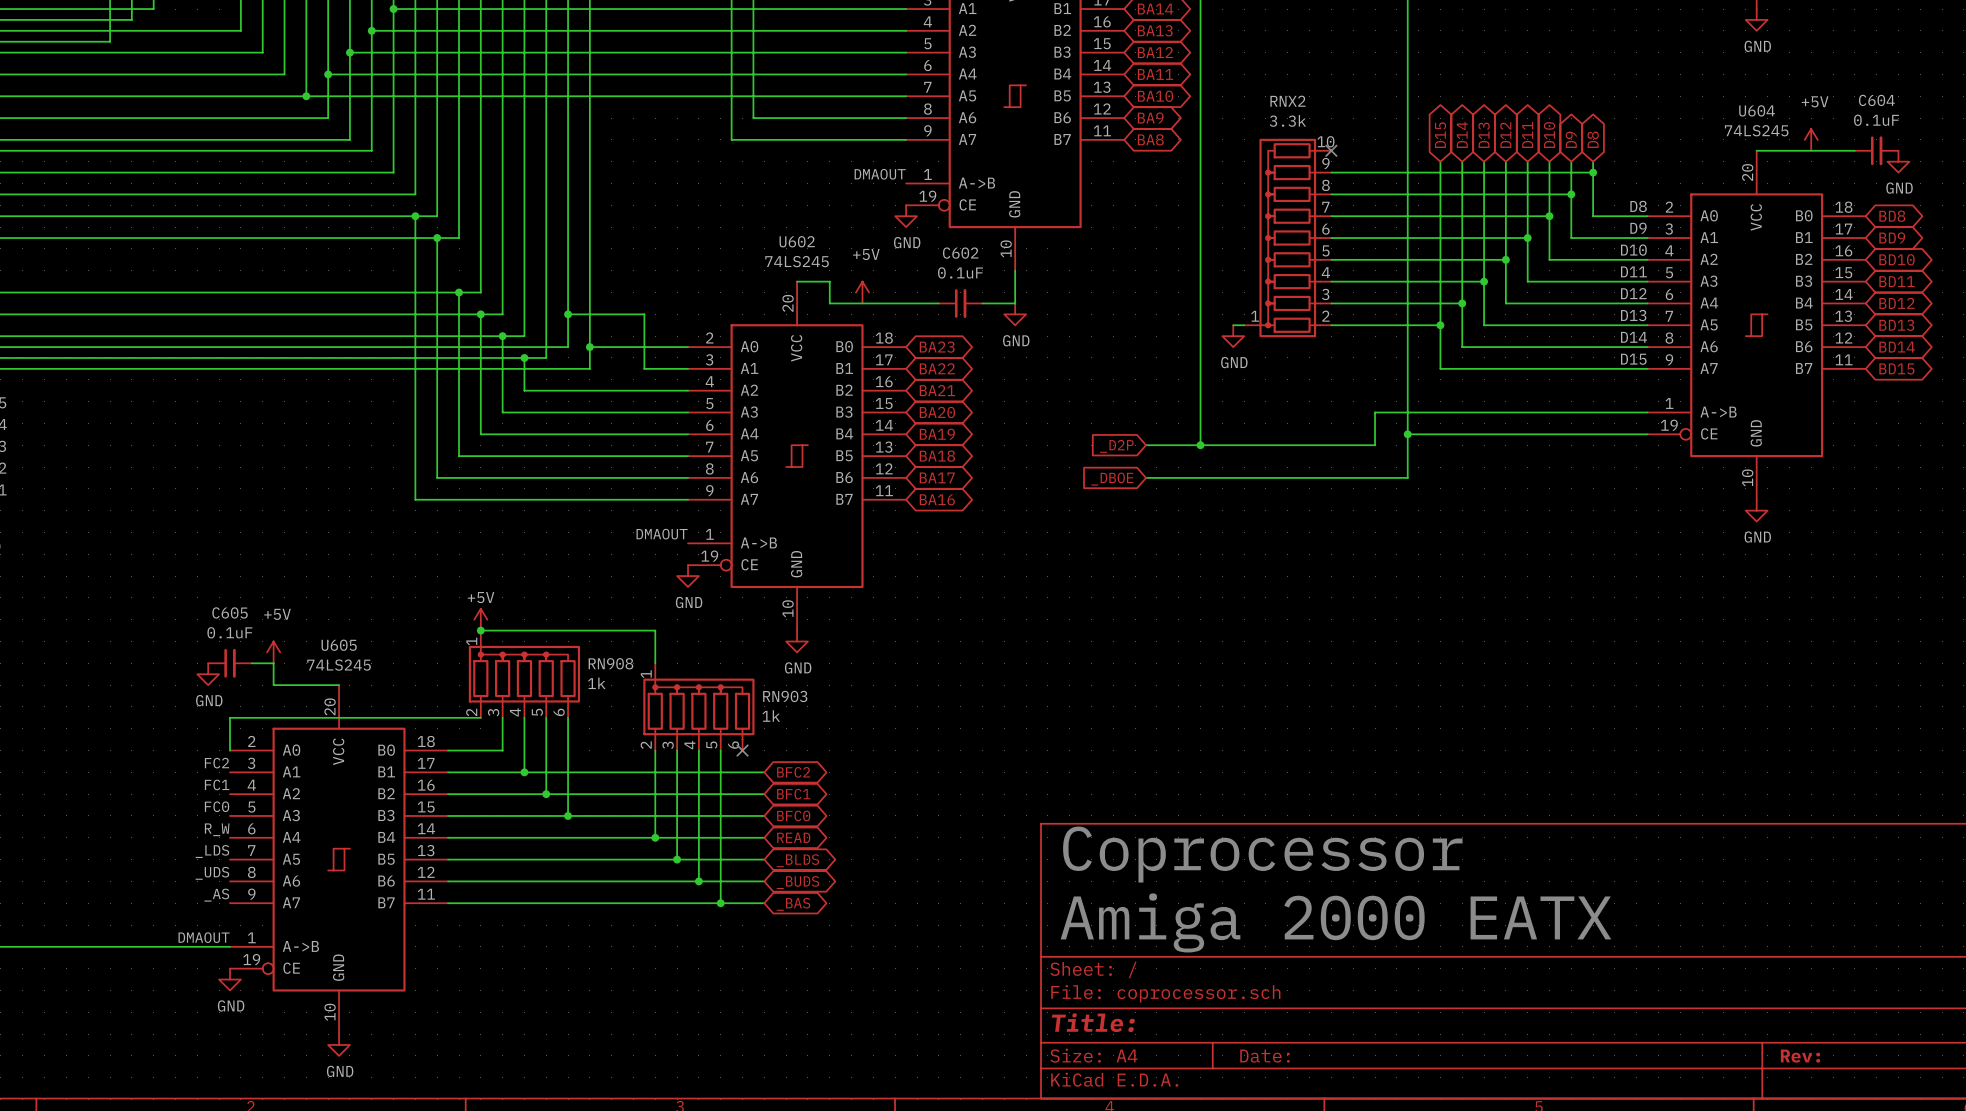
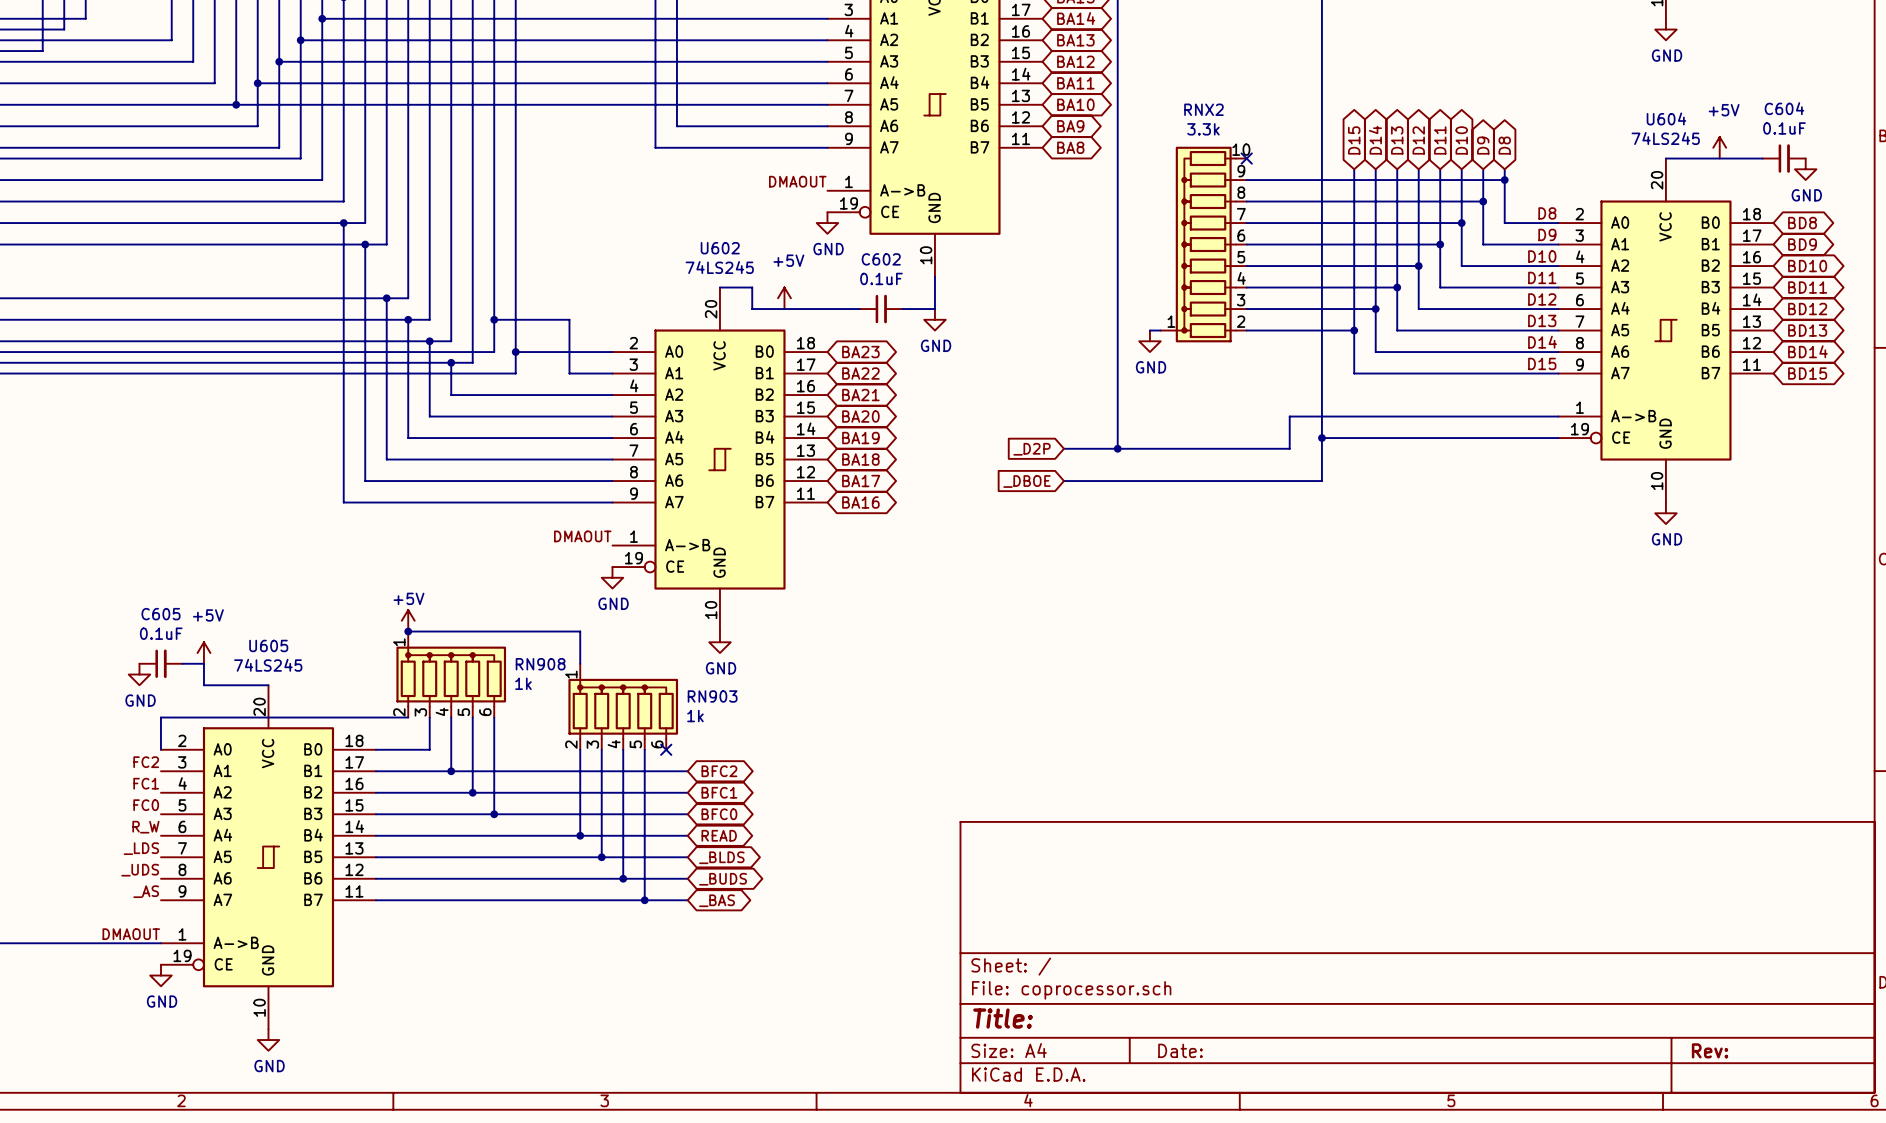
text: Coprocessor (1262, 854) -> none
text: Amiga 2000 EATX (1335, 922) -> none

